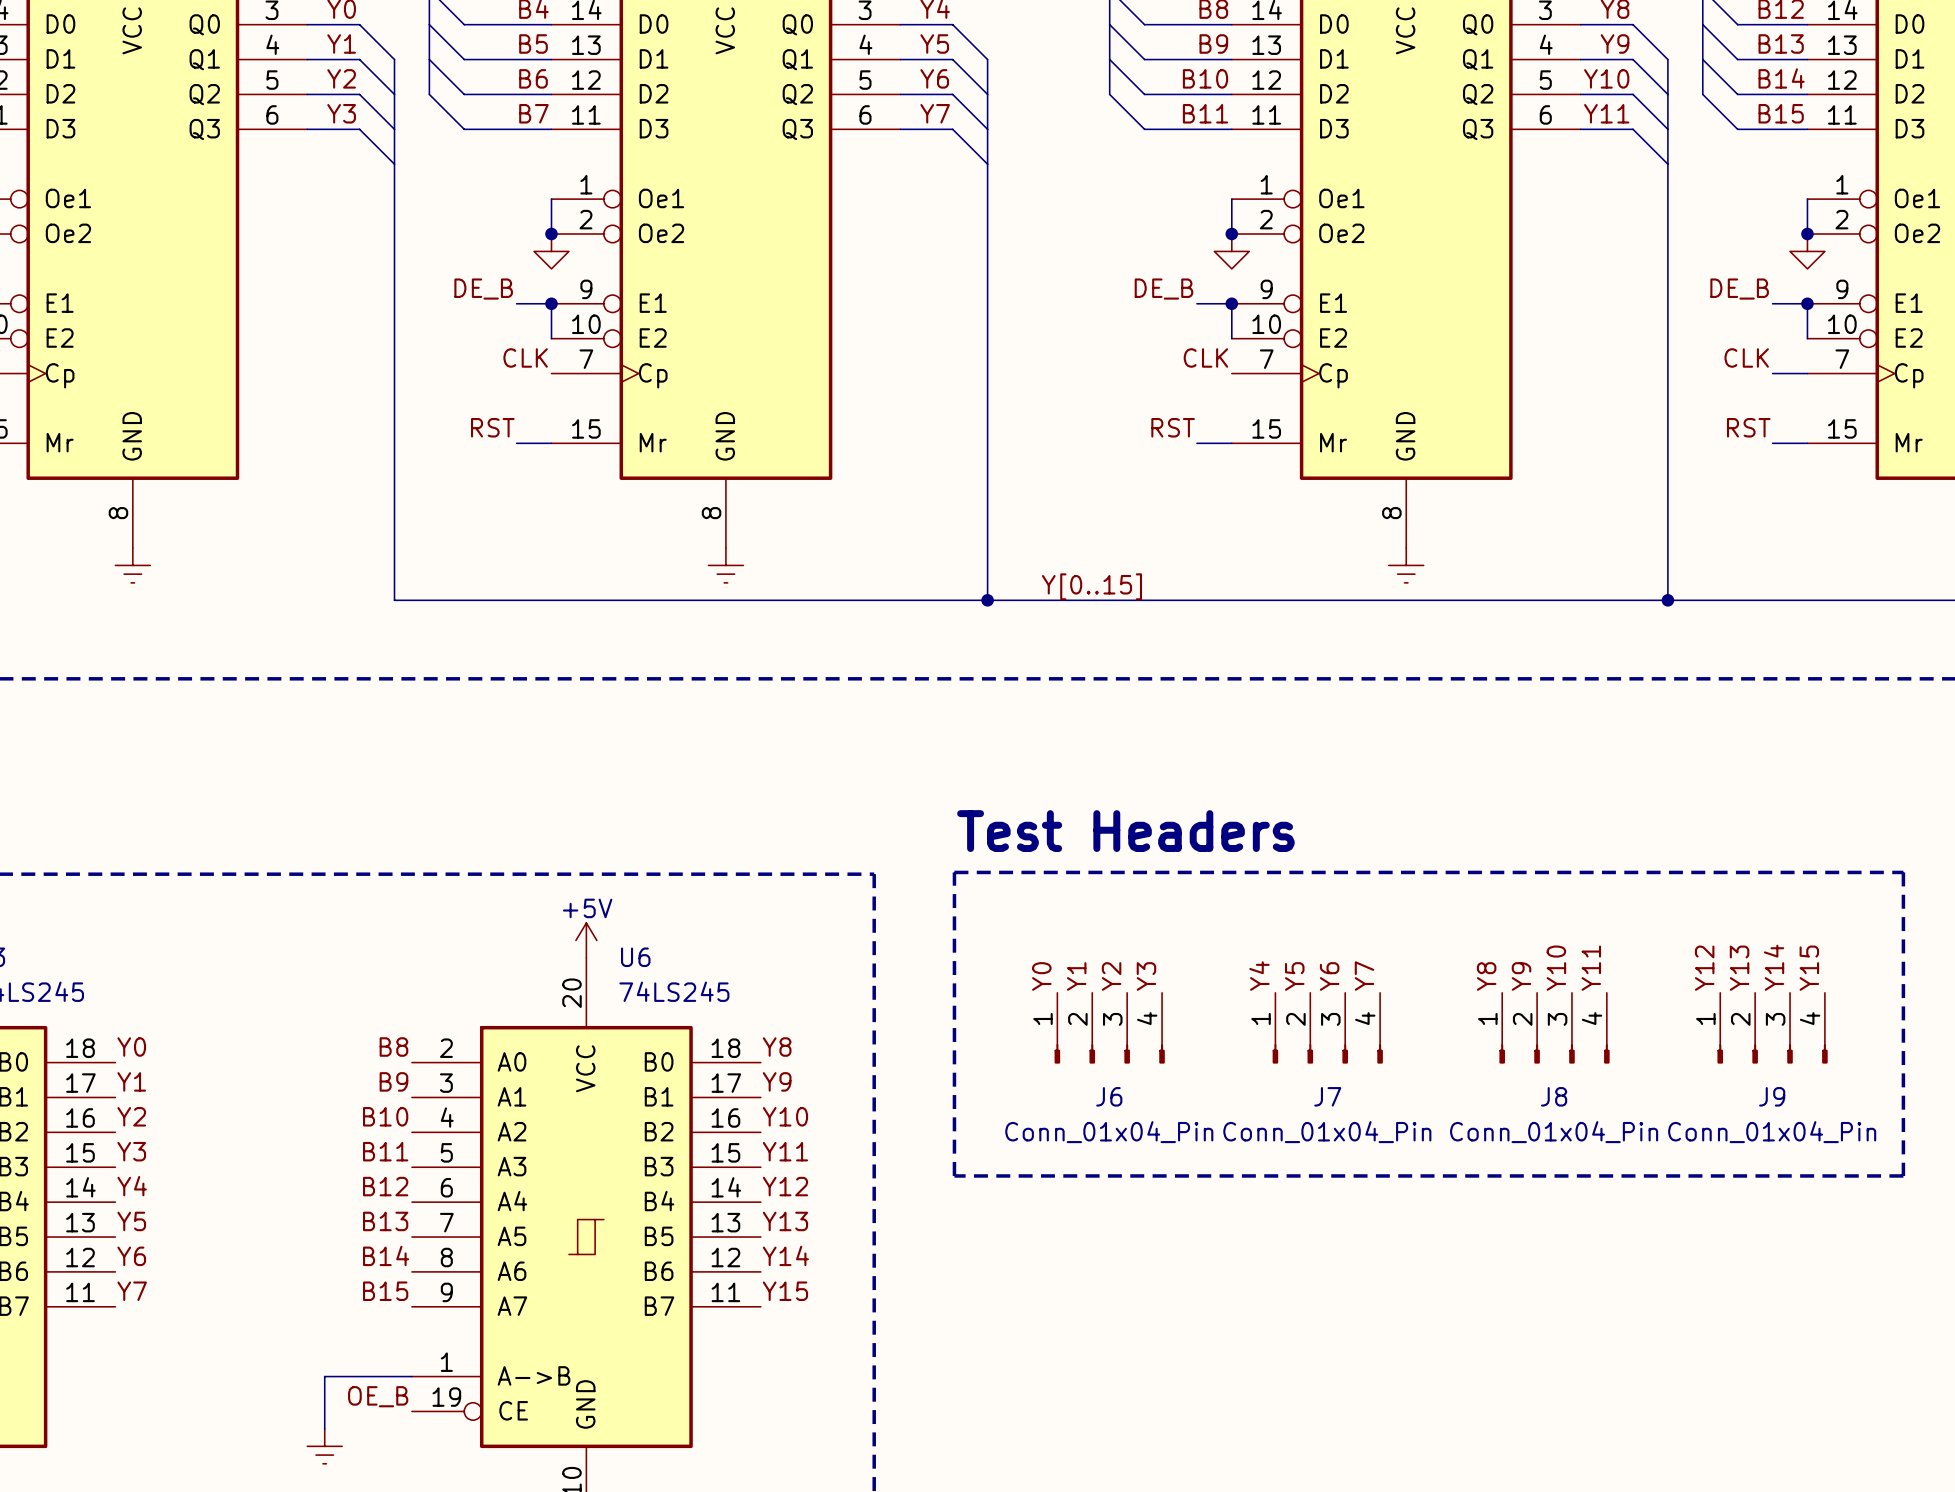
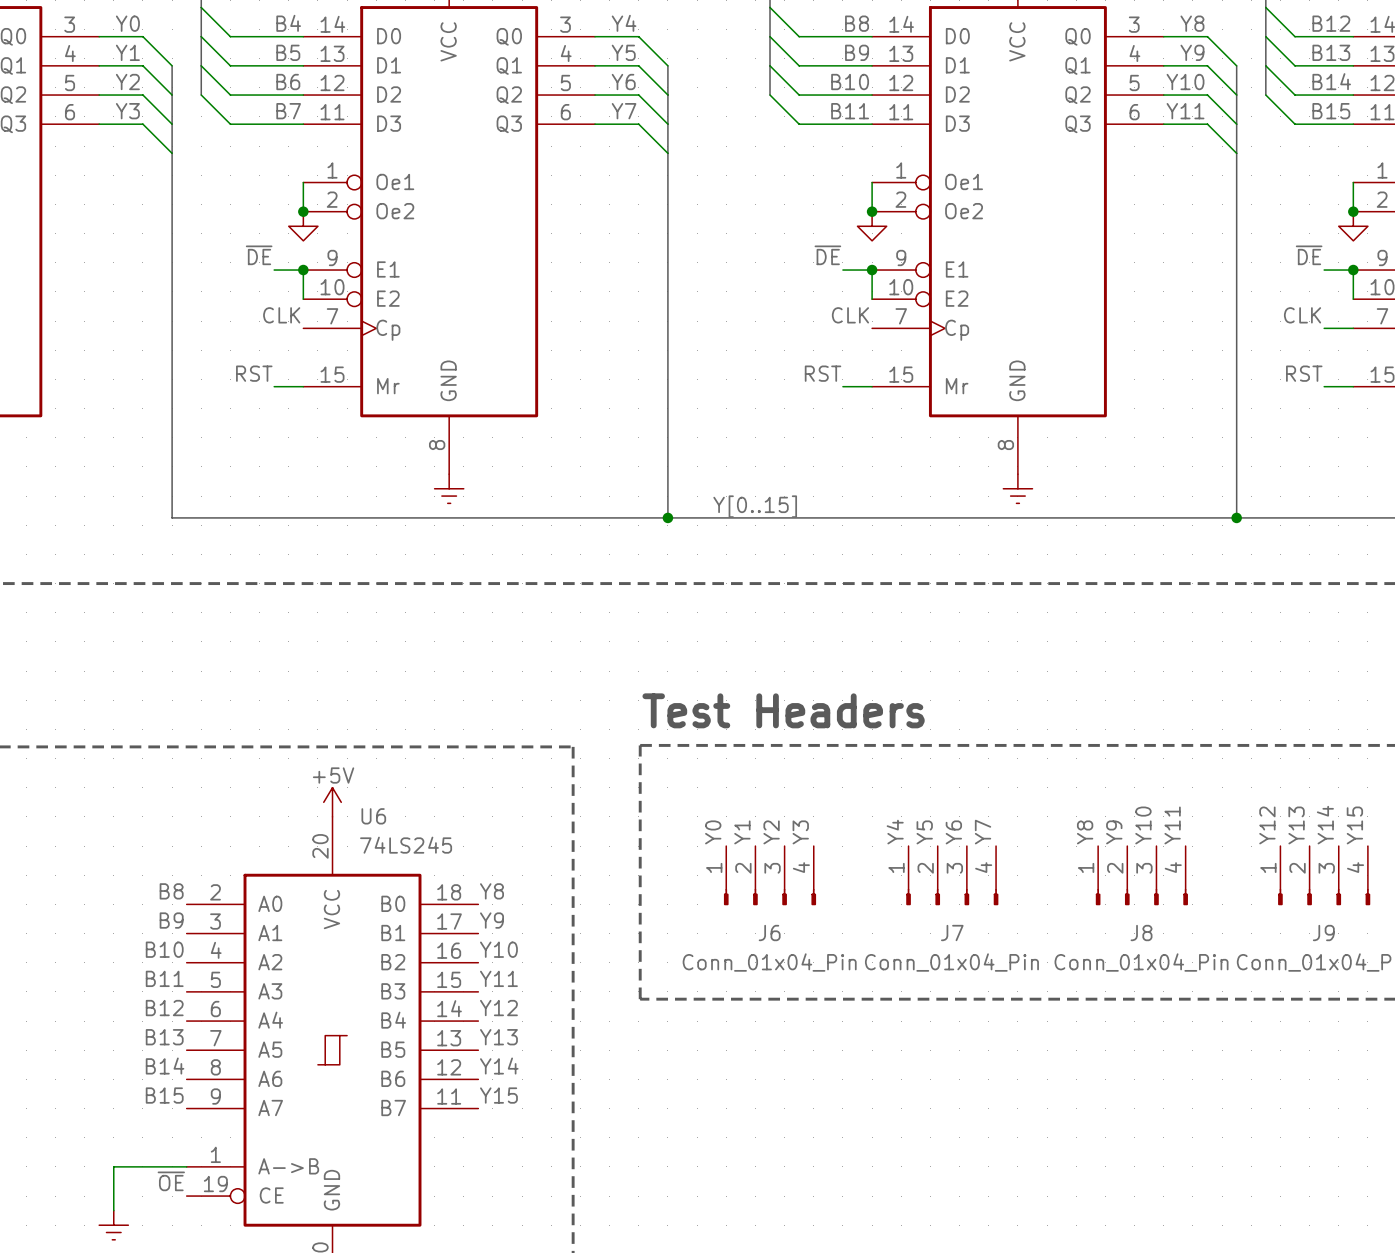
label: DE_B (483, 289) -> ~{DE} (259, 255)
label: DE_B (1163, 289) -> ~{DE} (827, 255)
label: DE_B (1739, 289) -> ~{DE} (1309, 255)
label: OE_B (378, 1396) -> ~{OE} (171, 1181)

